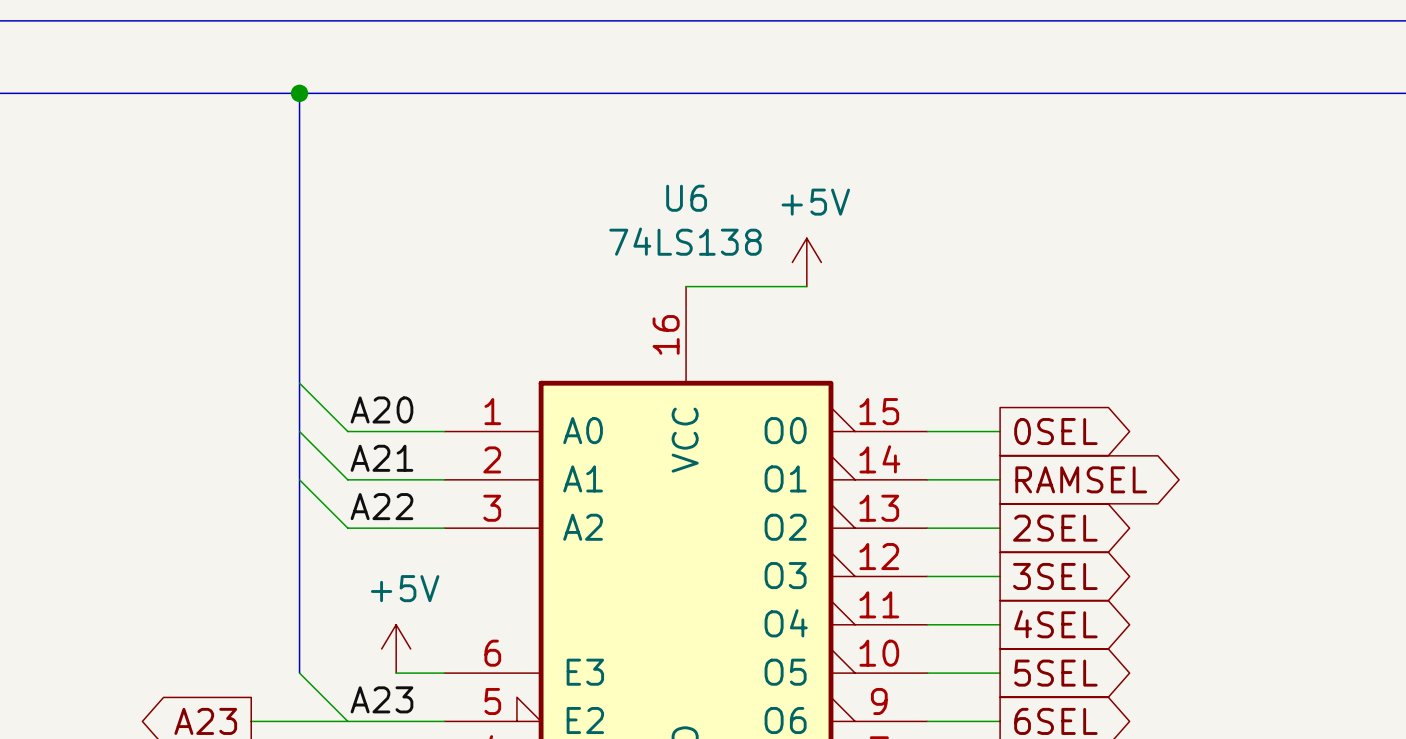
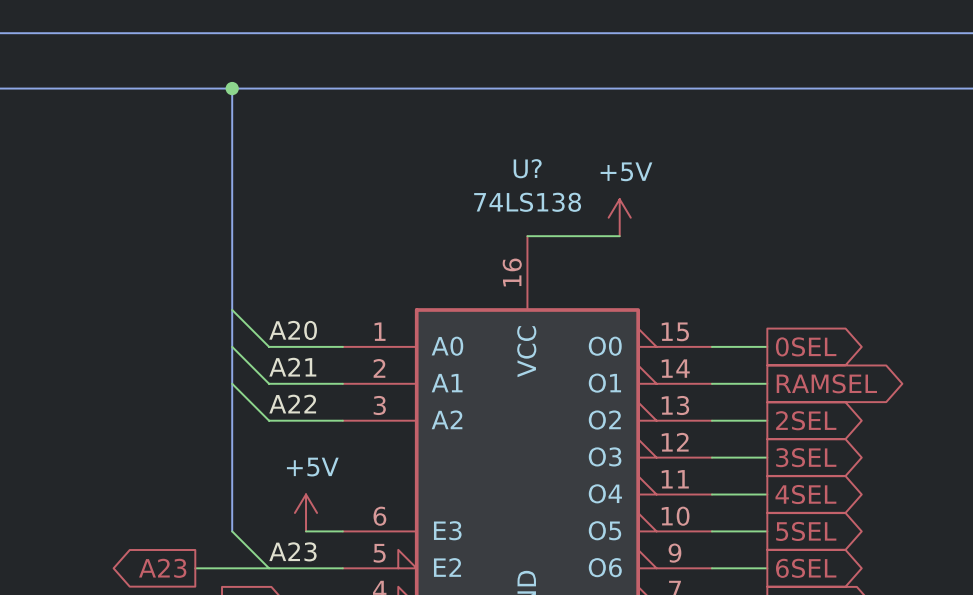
U6 name: U6 (686, 198) -> U? (527, 168)

